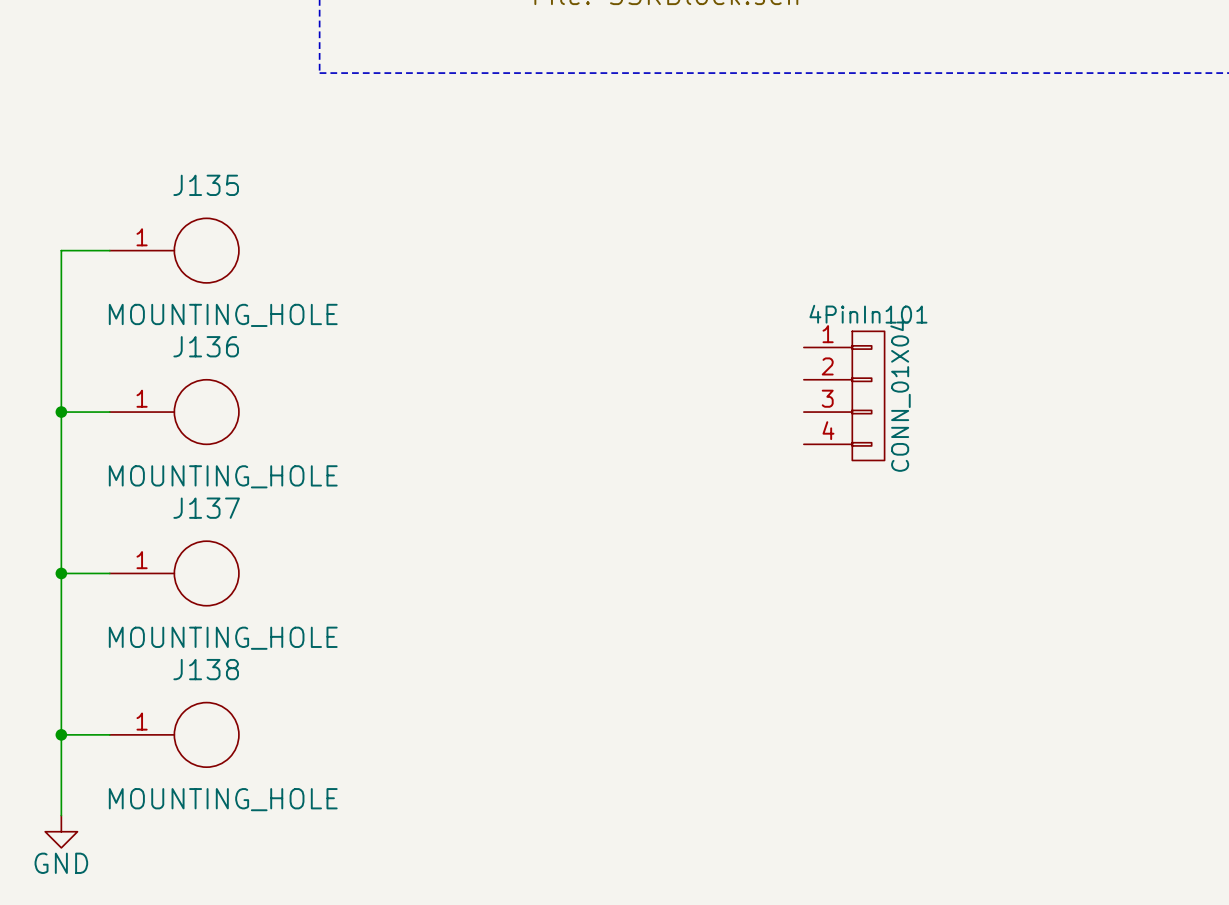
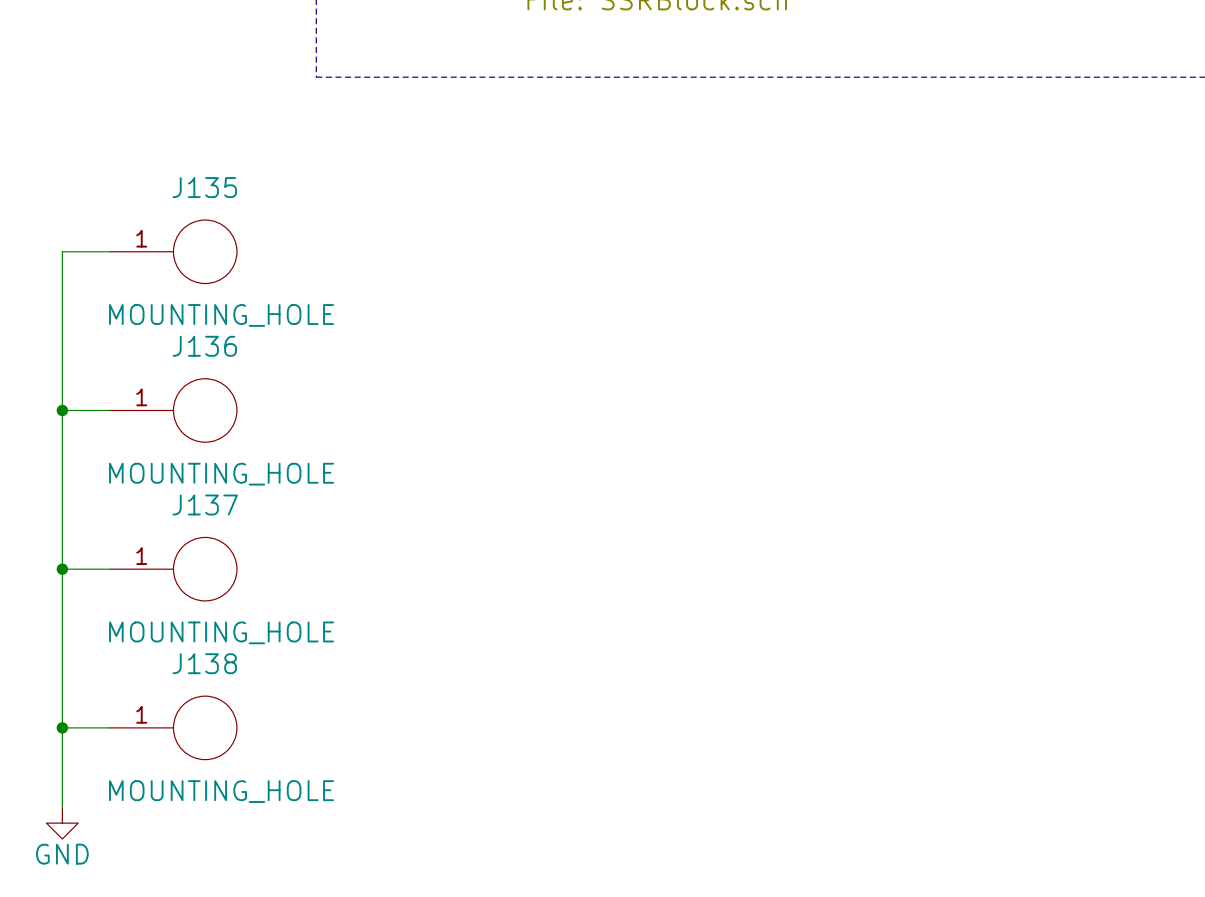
4PinIn101: CONN_01X04 (844, 395) -> none

